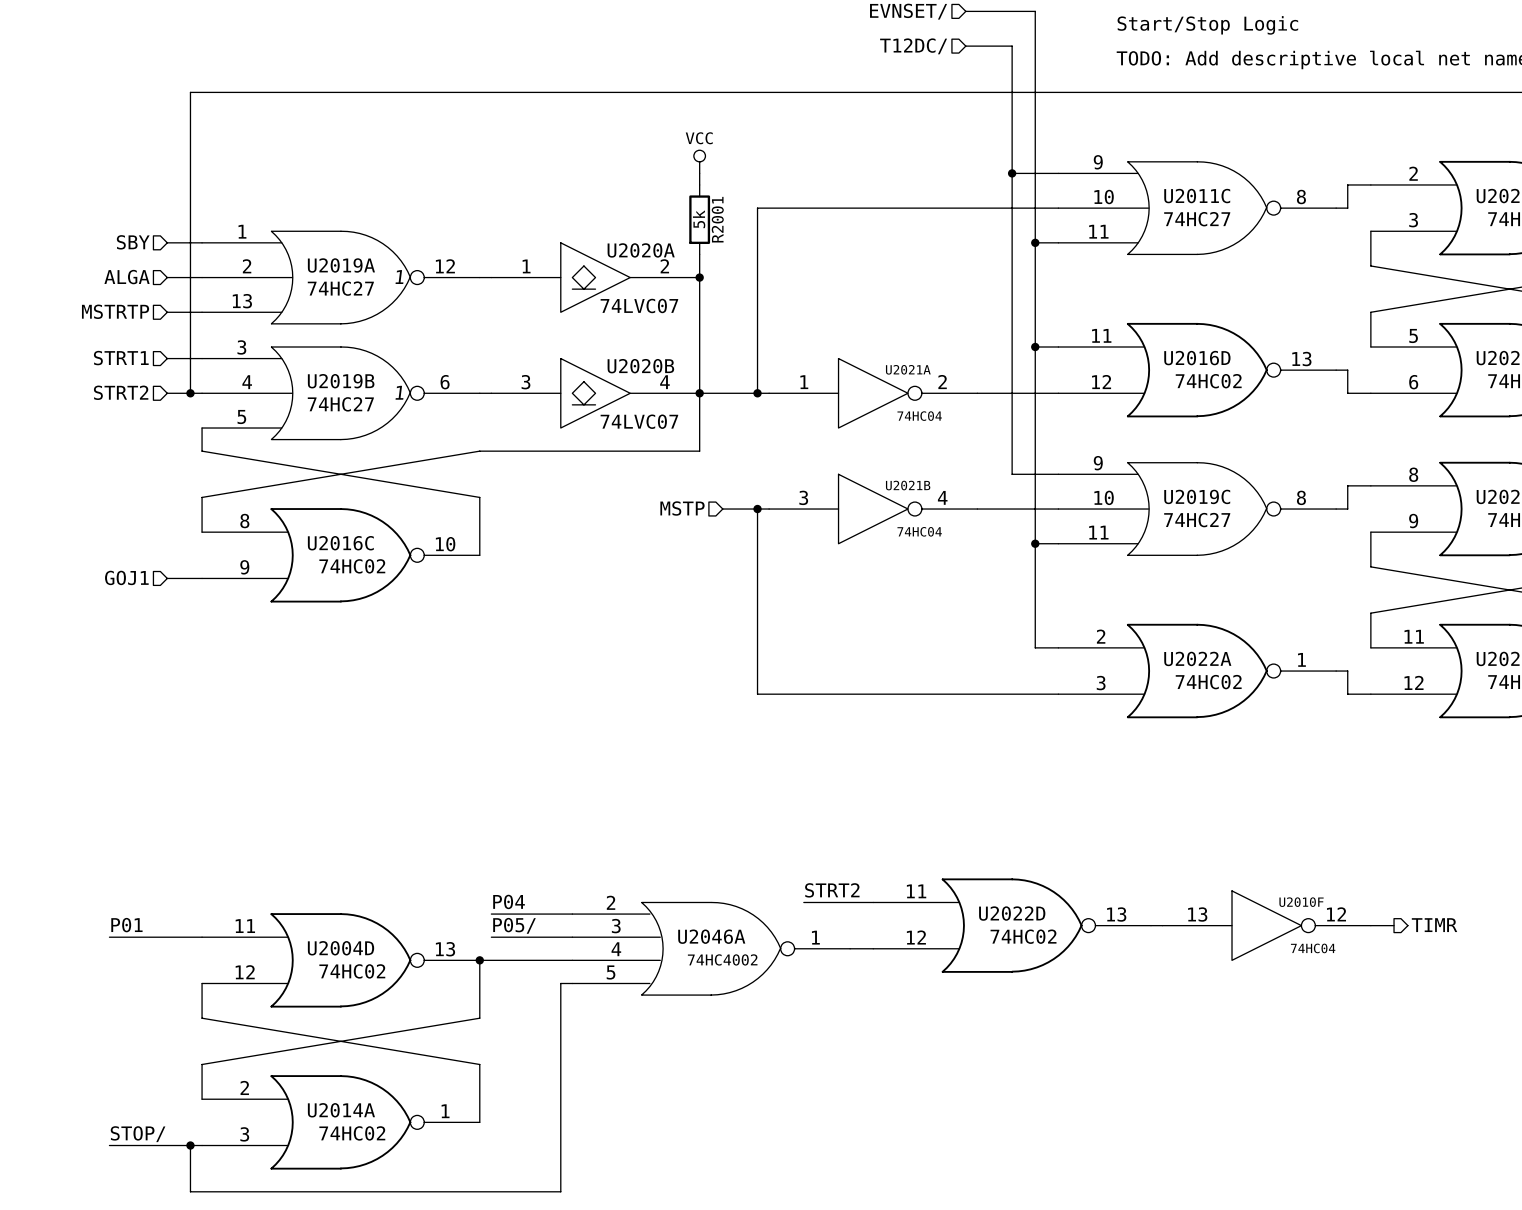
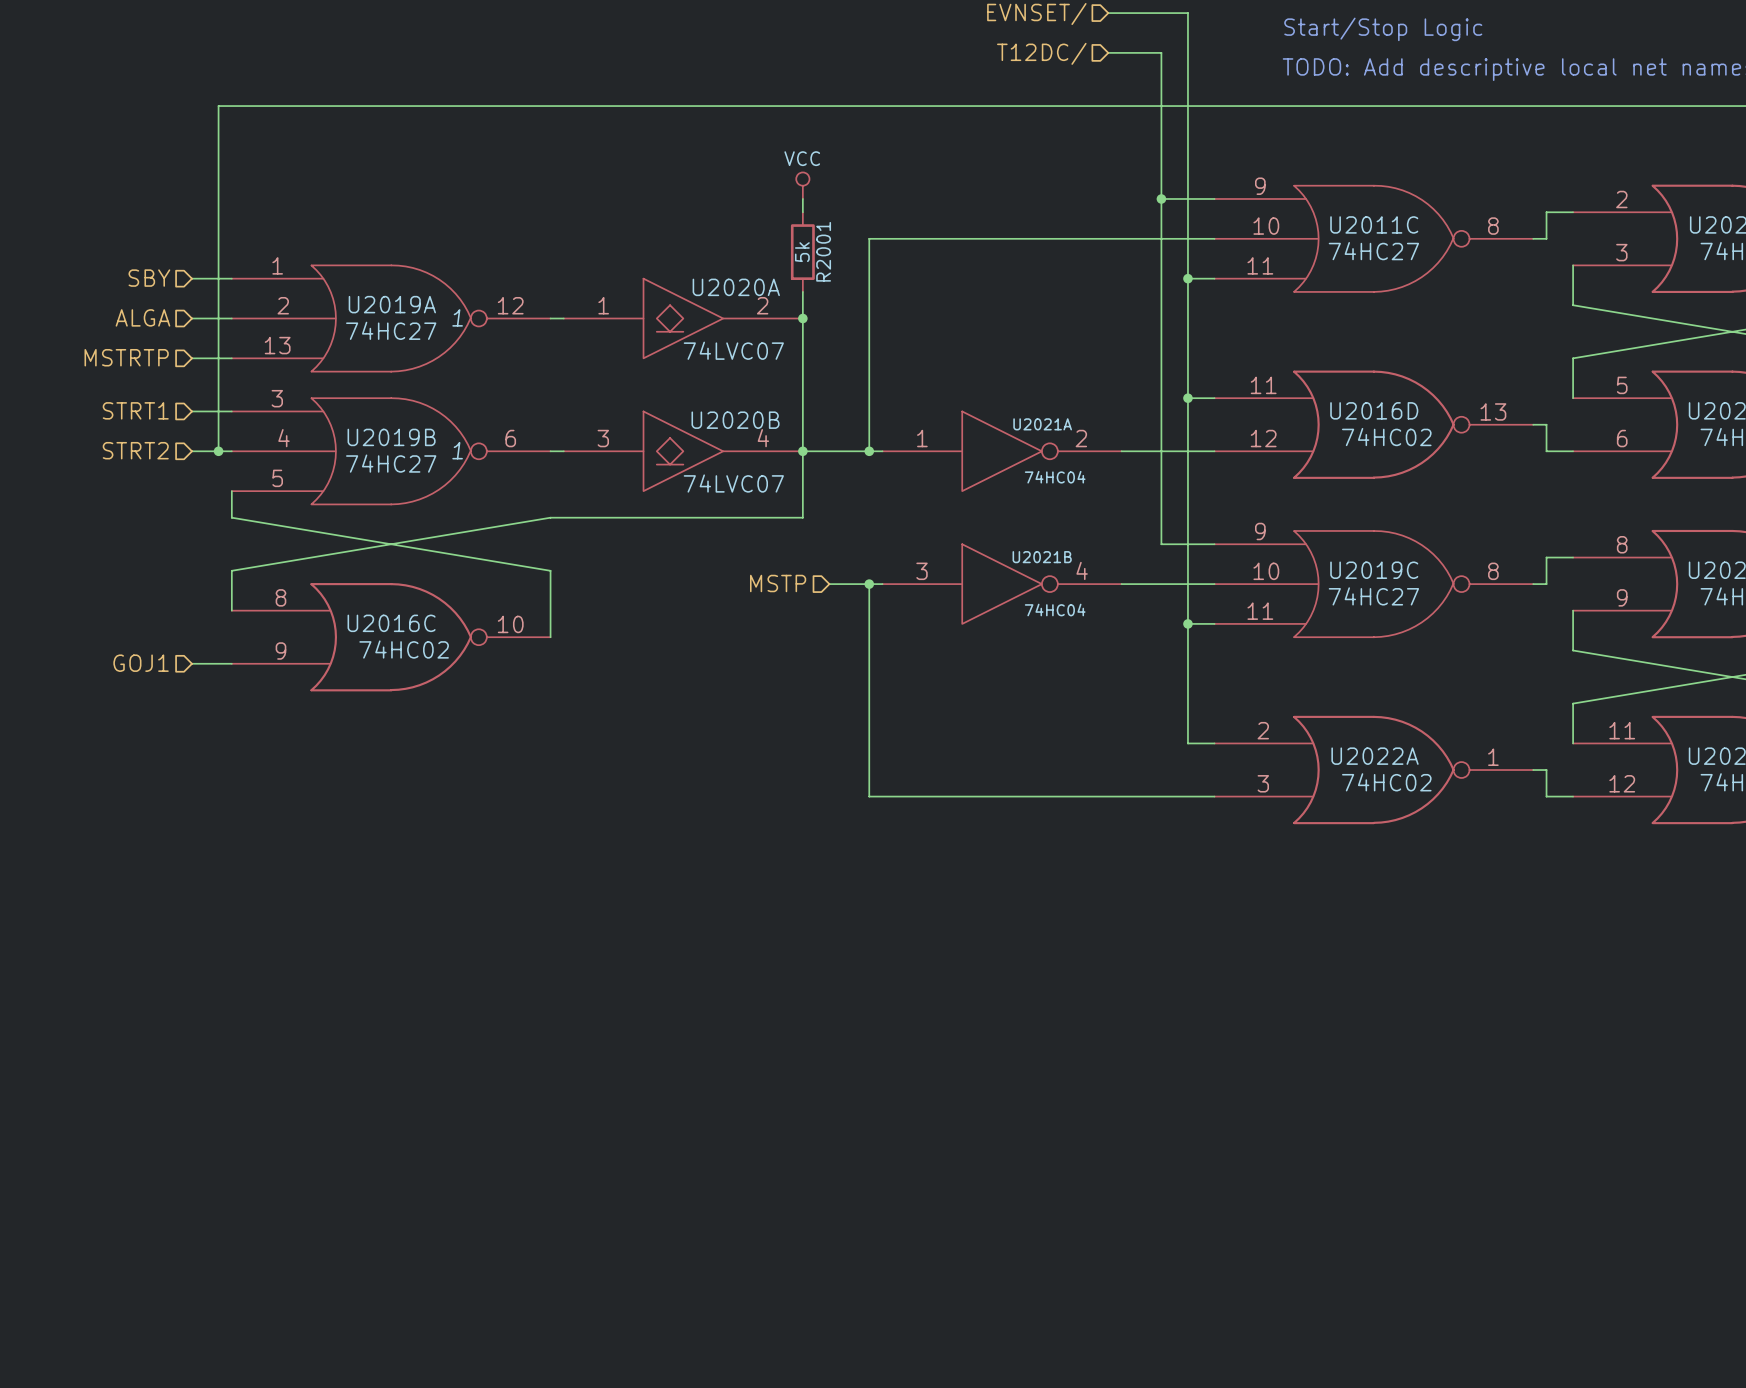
label: STRT2 (832, 890) -> none
label: P04 (509, 901) -> none
wire: (803, 902) (873, 902) -> none
wire: (491, 914) (572, 914) -> none
label: P01 (126, 925) -> none
label: P05/ (514, 925) -> none
U2022D: 74HC02 (1012, 925) -> none
wire: (1150, 925) (1162, 925) -> none
U2010F: 74HC04 (1266, 925) -> none
wire: (1370, 925) (1394, 925) -> none
hierarchical label: TIMR (1434, 925) -> none
wire: (109, 937) (202, 937) -> none
wire: (491, 937) (572, 937) -> none
U2046A: 74HC4002 (711, 948) -> none
wire: (850, 948) (873, 948) -> none
U2004D: 74HC02 (340, 960) -> none
junction: (479, 960) -> none
wire: (572, 960) (479, 960) (479, 1018) (202, 1064) (202, 1099) -> none
wire: (202, 983) (202, 1018) (479, 1064) (479, 1122) -> none
wire: (572, 983) (560, 983) (560, 1191) (190, 1191) (190, 1145) -> none
U2014A: 74HC02 (340, 1122) -> none
label: STOP/ (138, 1134) -> none
wire: (109, 1145) (202, 1145) -> none
junction: (190, 1145) -> none

